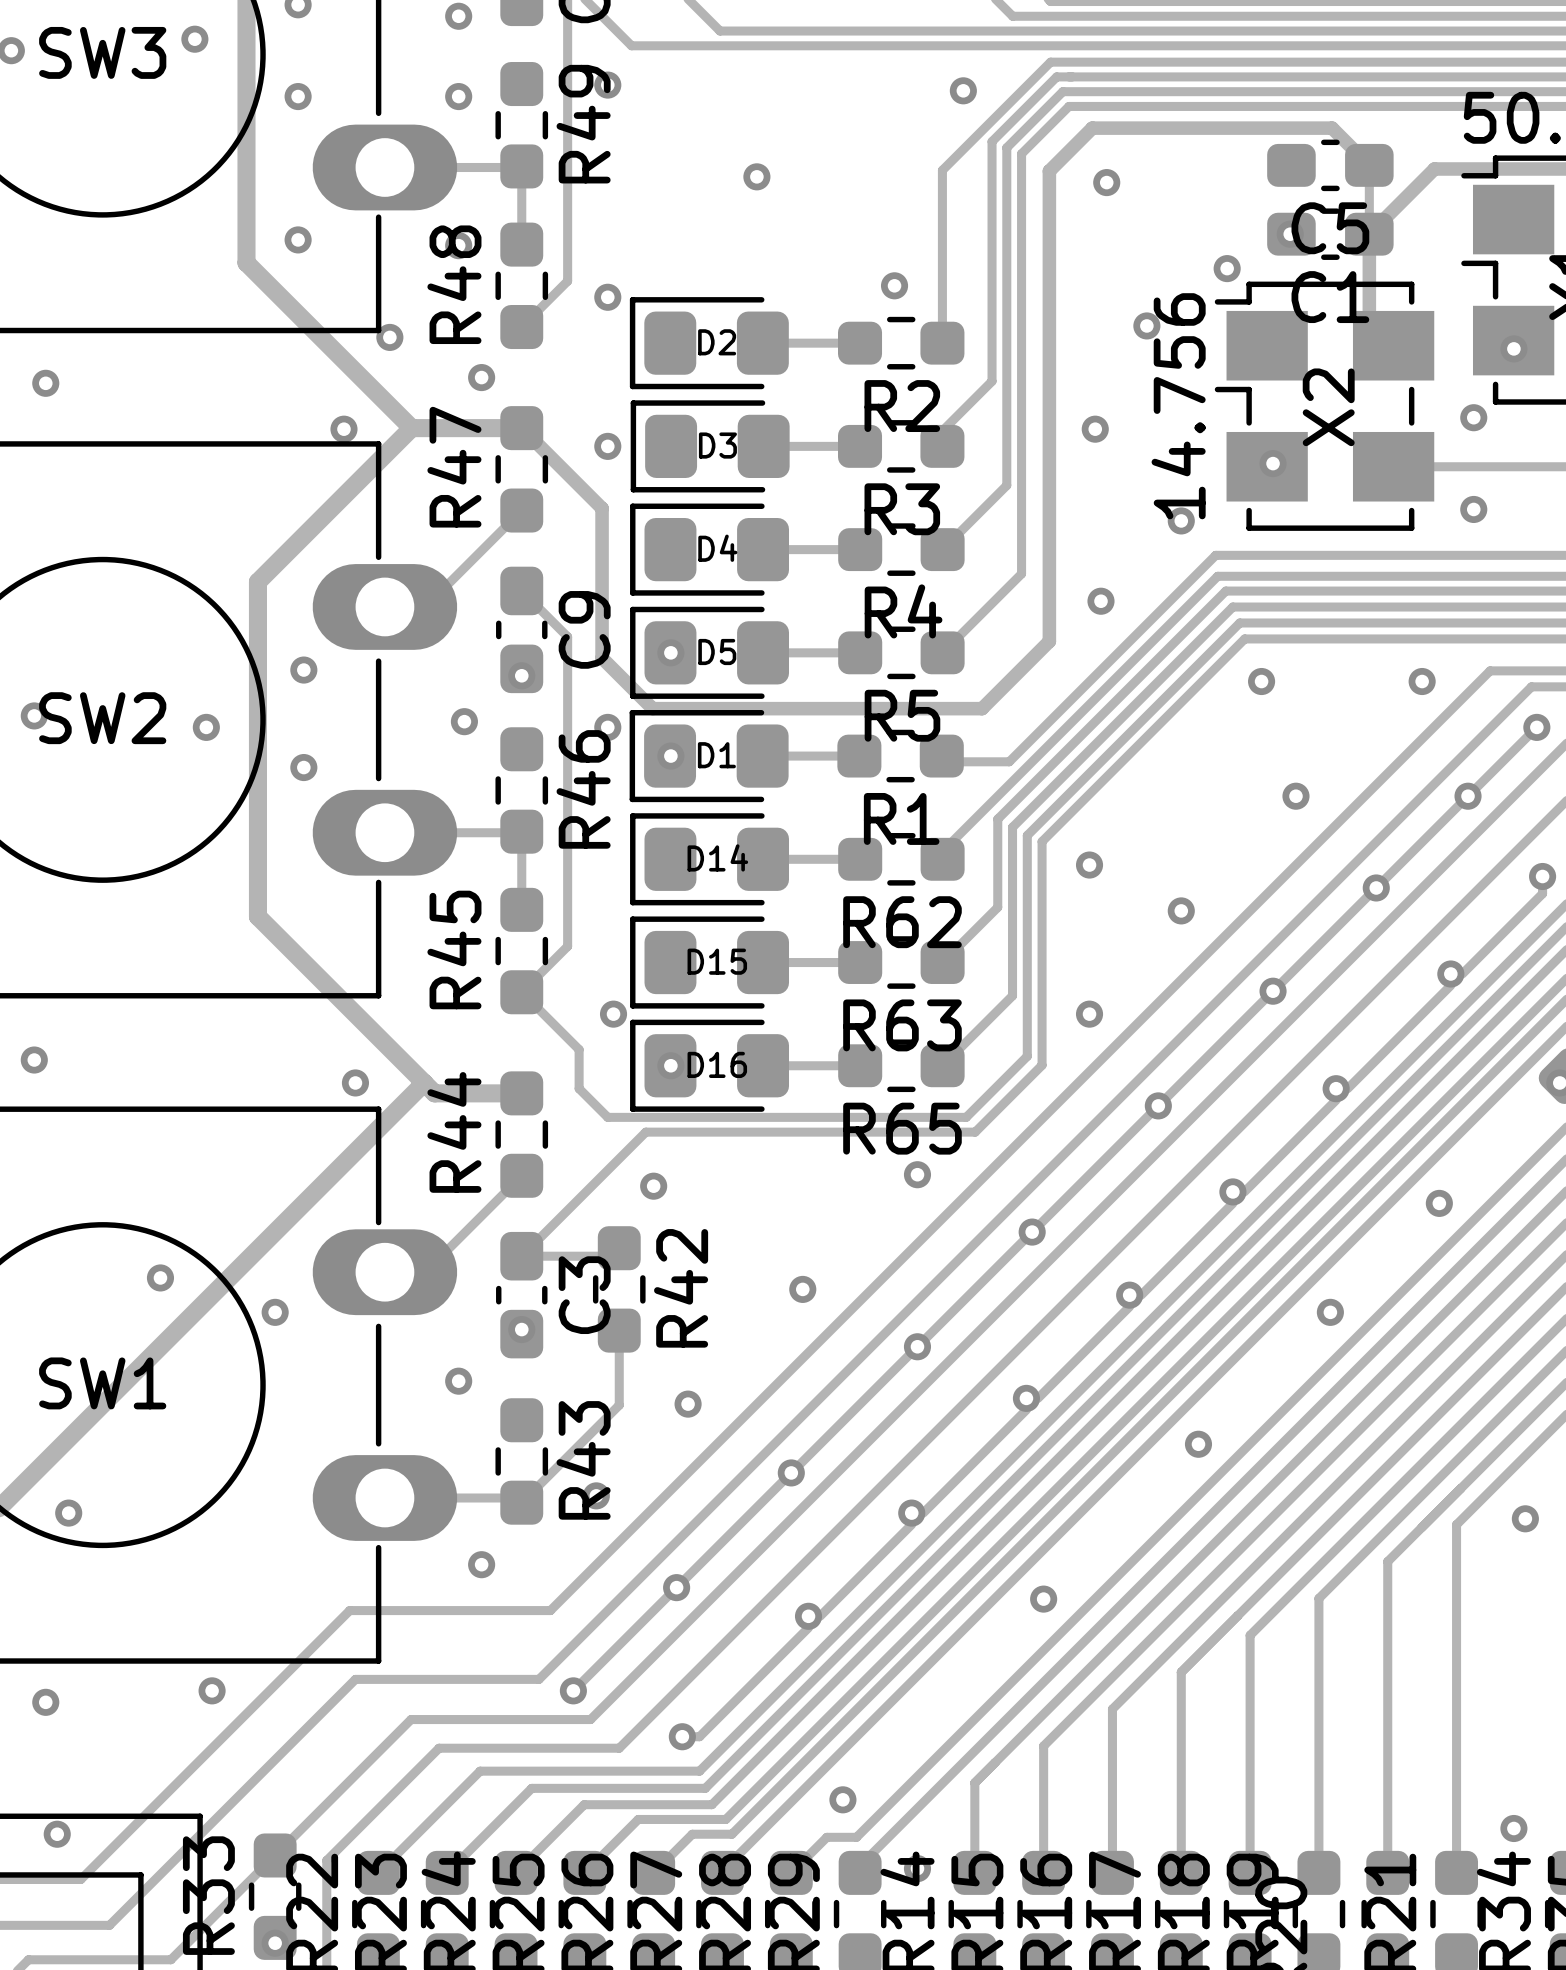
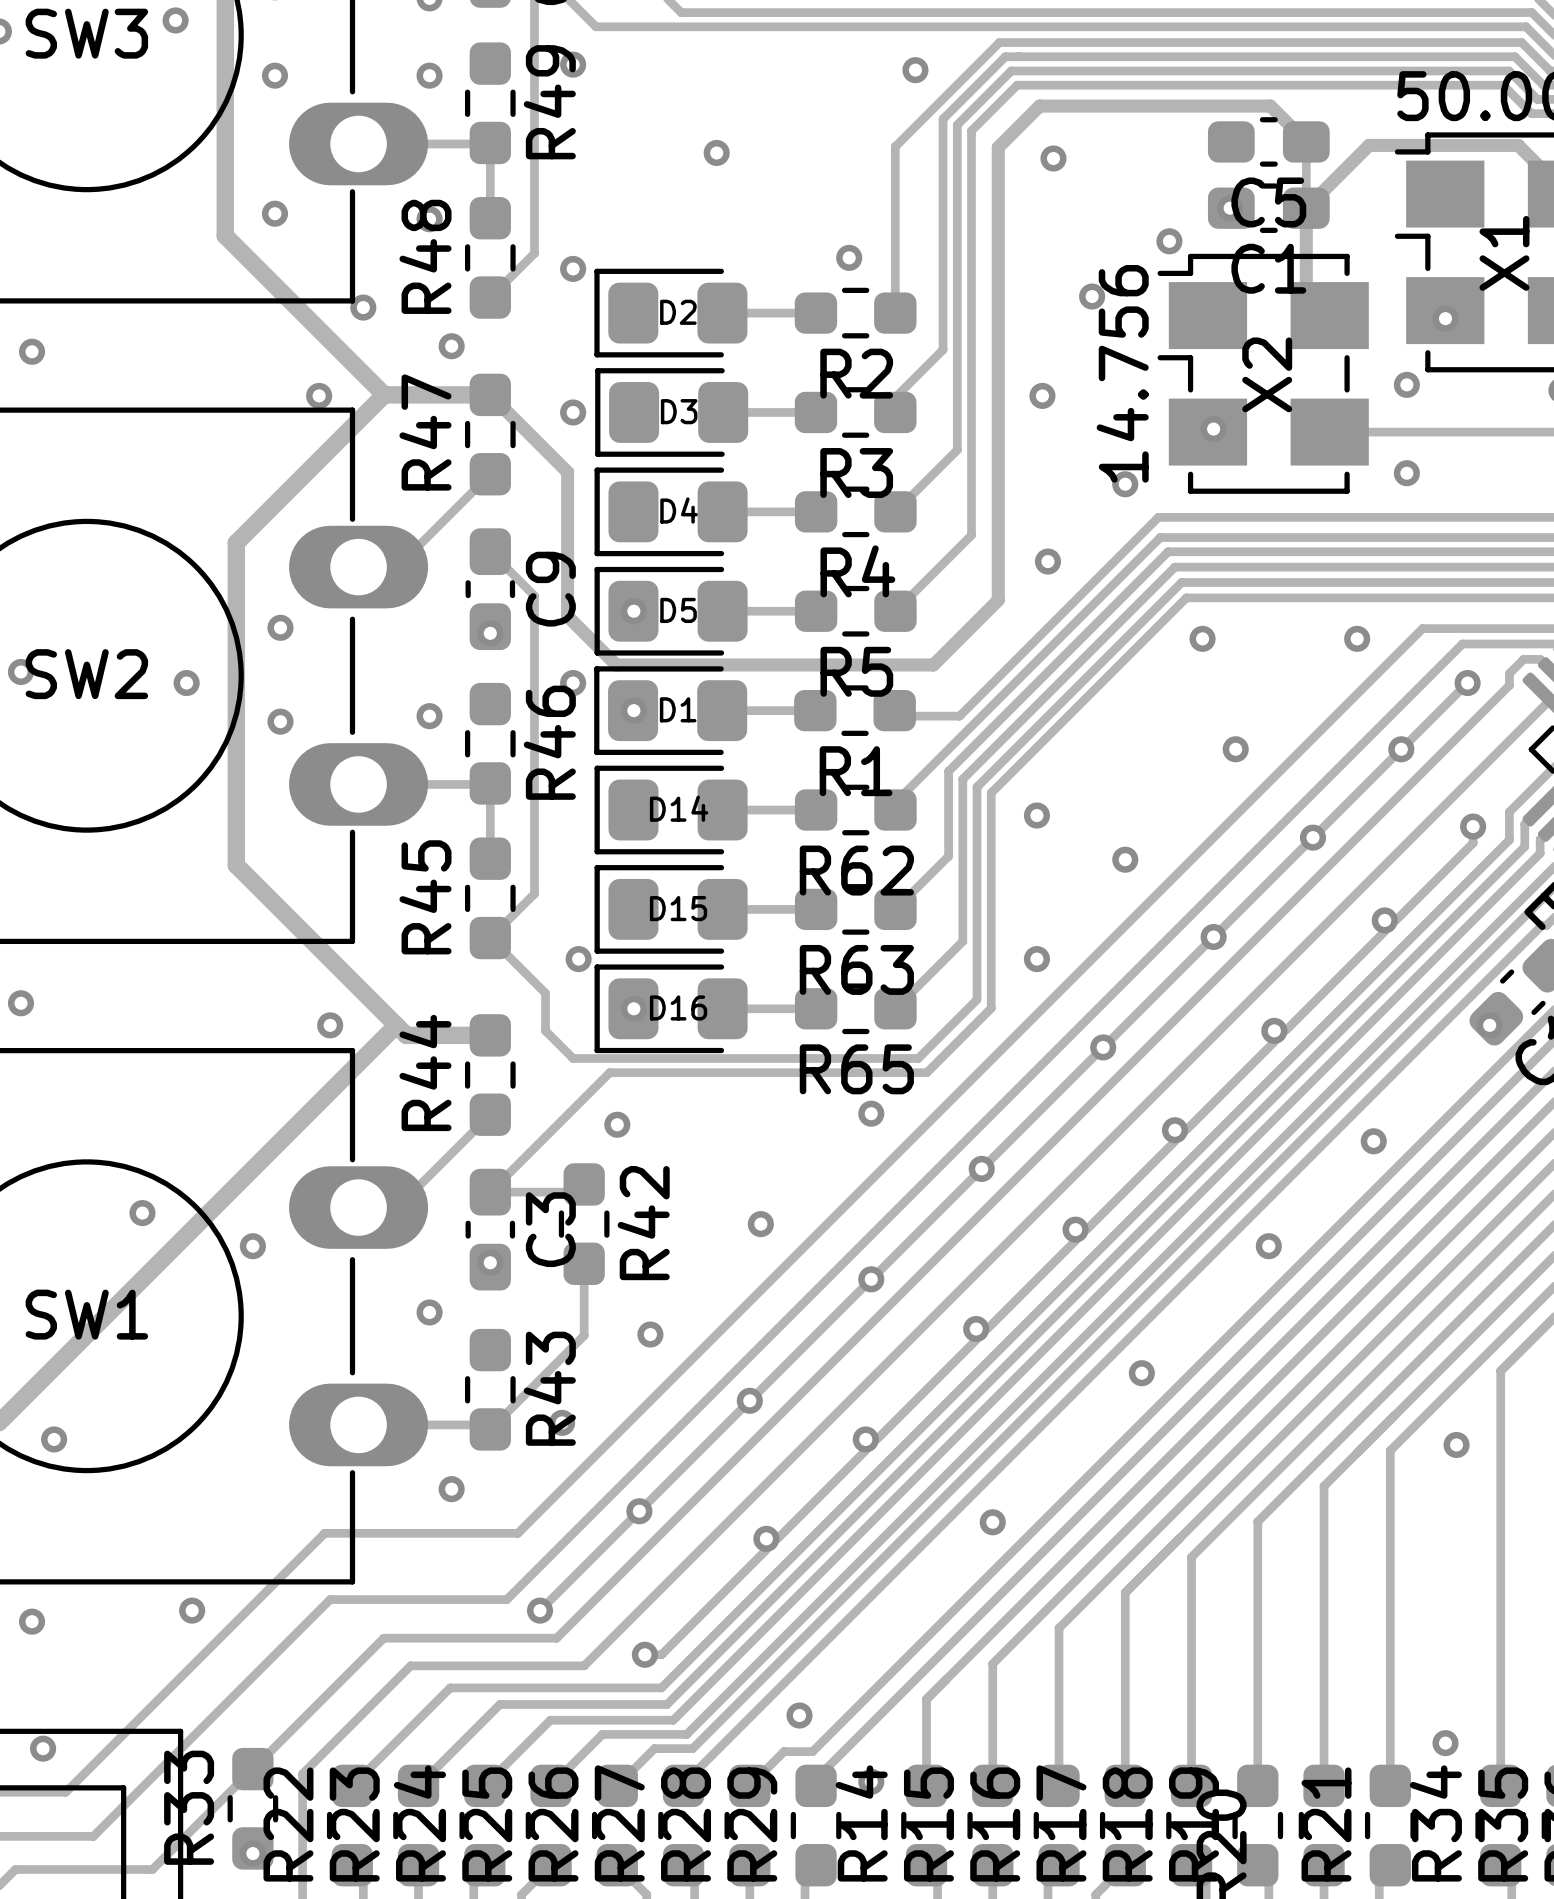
via position: (464, 721) -> (429, 716)

